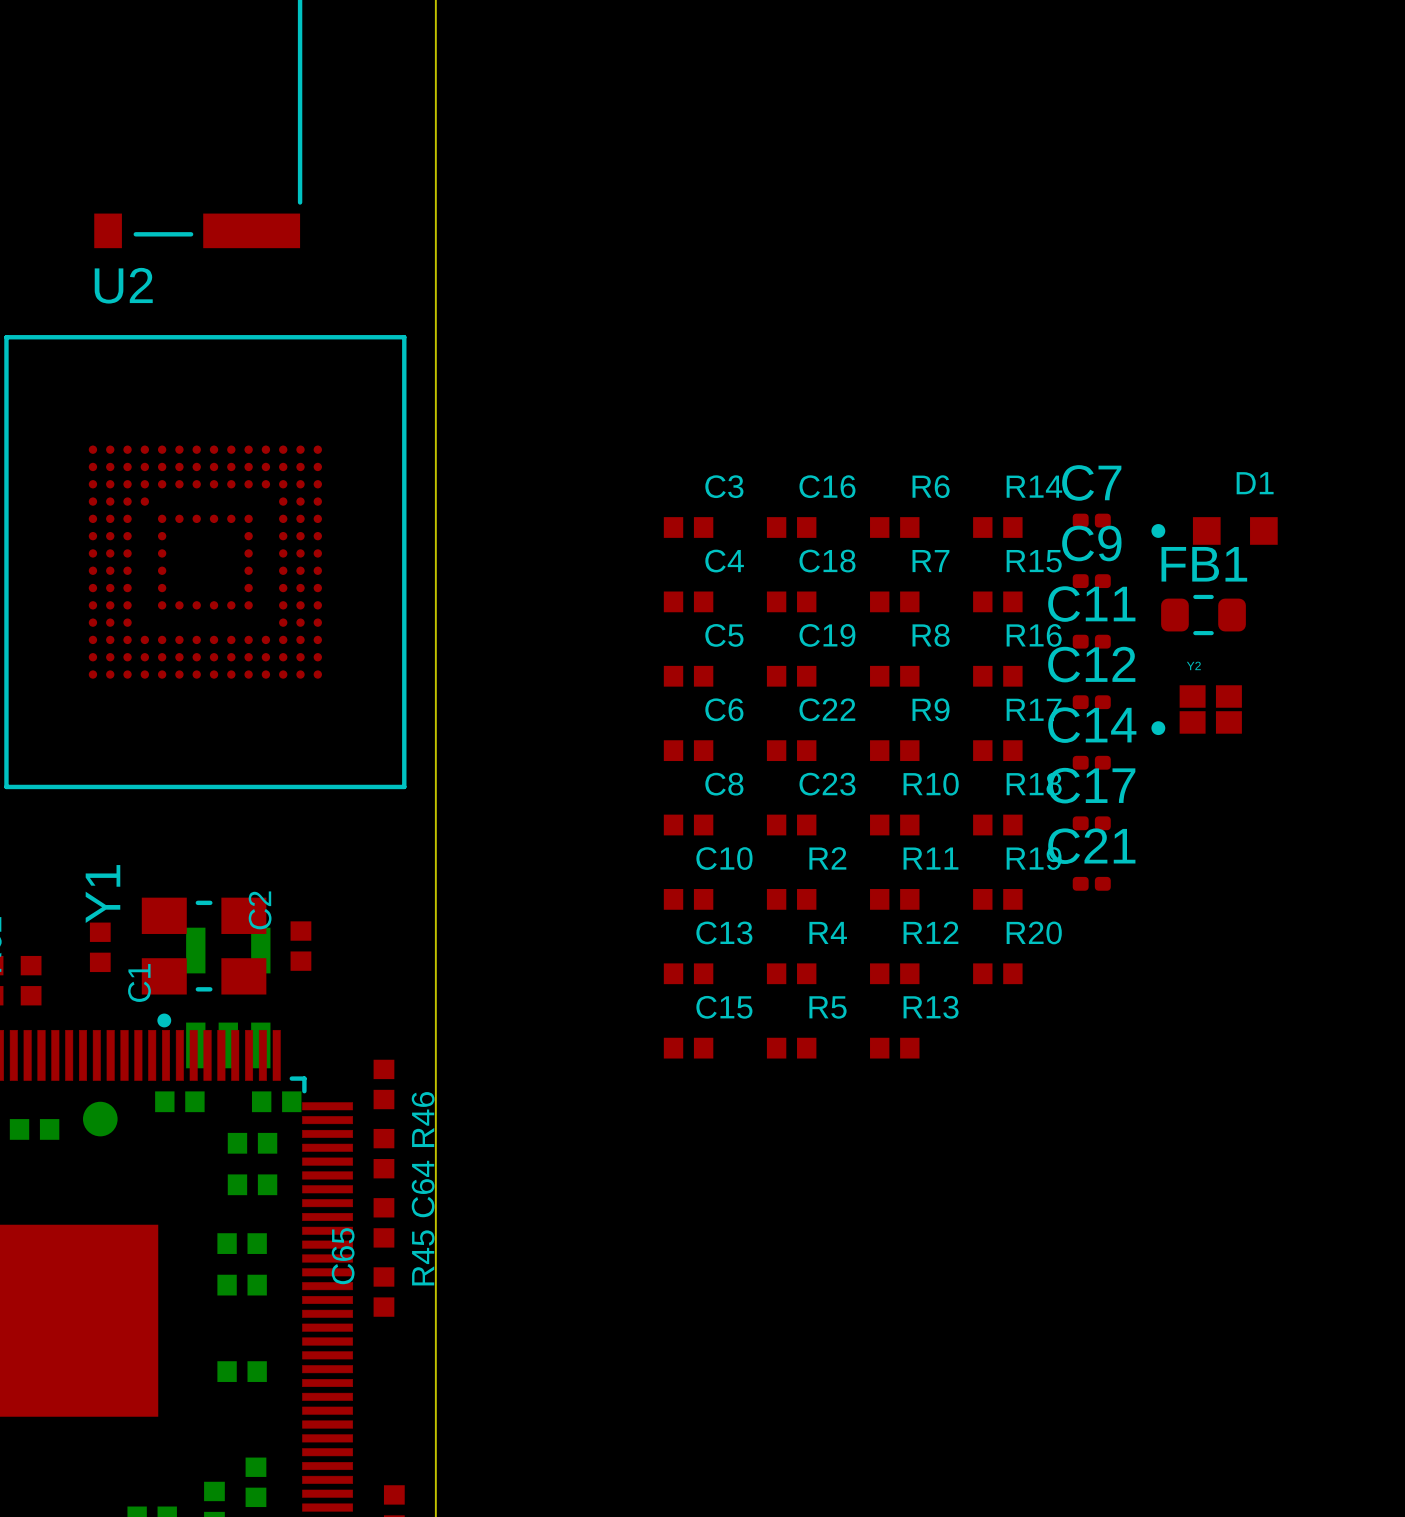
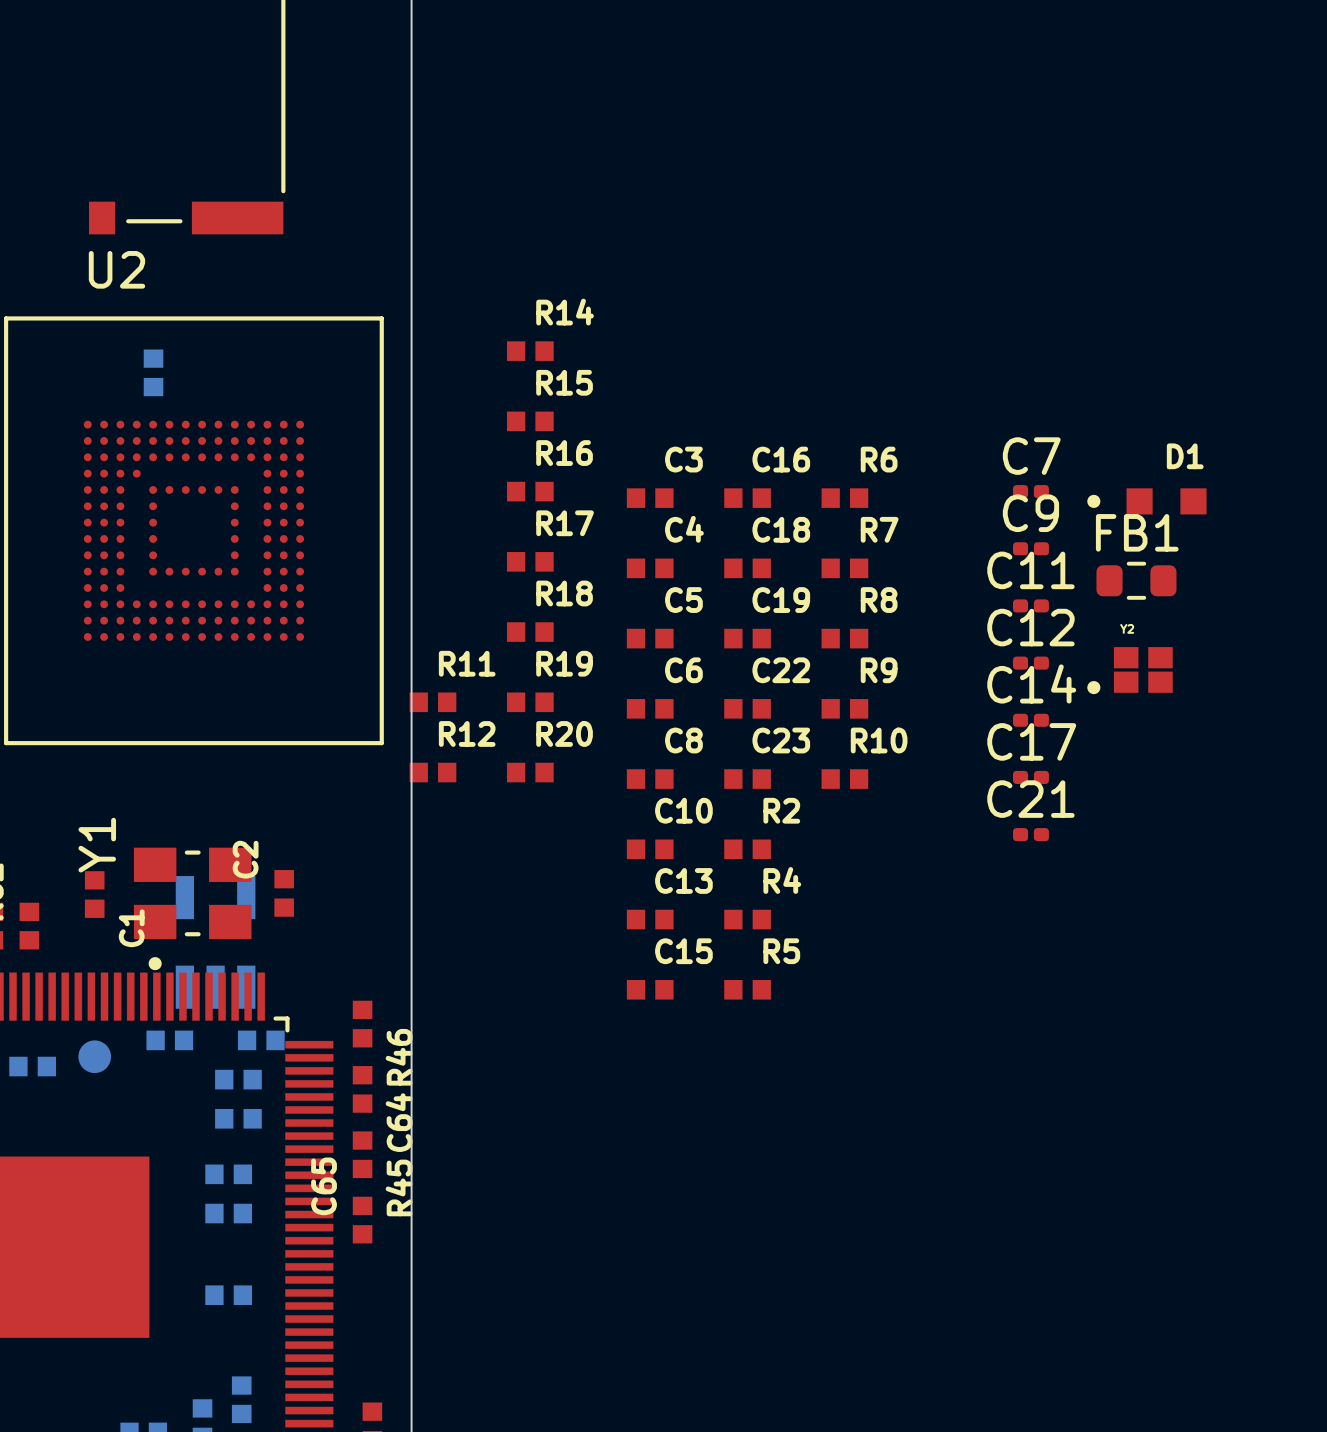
part: none -> (153, 372)
R14 position: (997, 527) -> (530, 351)
R15 position: (997, 601) -> (530, 421)
R16 position: (997, 676) -> (530, 491)
R17 position: (997, 750) -> (530, 561)
R18 position: (997, 825) -> (530, 632)
R11 position: (894, 899) -> (432, 702)
R19 position: (997, 899) -> (530, 702)
R12 position: (894, 973) -> (432, 772)
R20 position: (997, 973) -> (530, 772)
R13: (894, 1048) -> none

